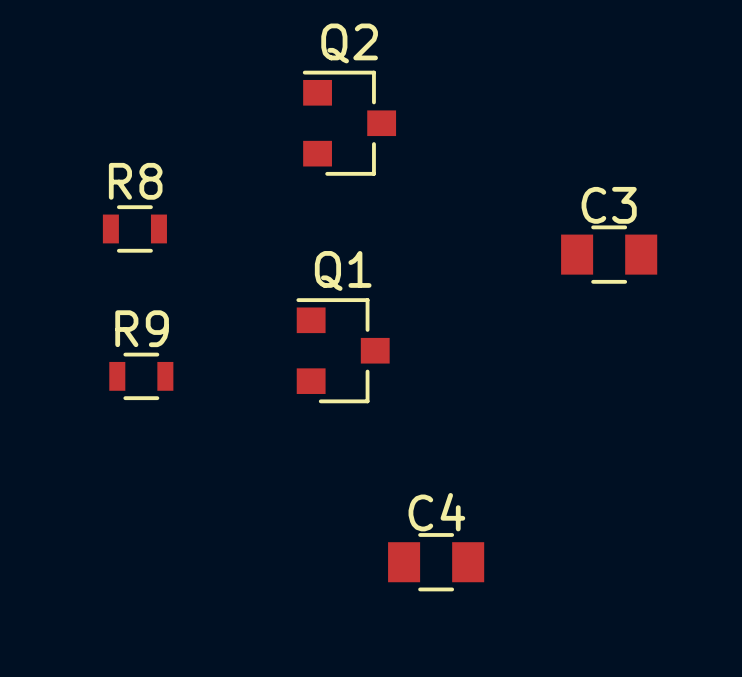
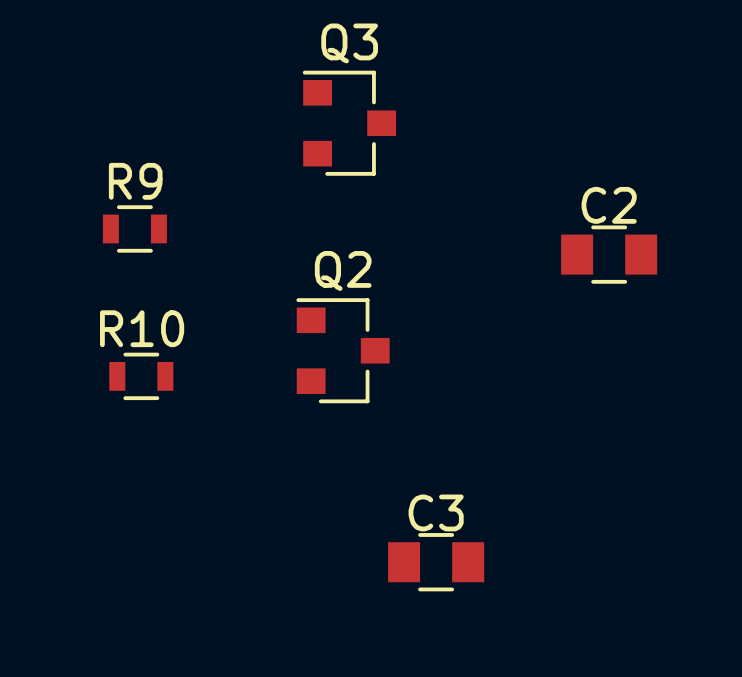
Q2 name: Q2 (349, 43) -> Q3 (349, 43)
R8 name: R8 (135, 181) -> R9 (135, 181)
C3 name: C3 (609, 205) -> C2 (609, 205)
Q1 name: Q1 (343, 270) -> Q2 (343, 270)
R9 name: R9 (142, 328) -> R10 (142, 328)
C4 name: C4 (436, 512) -> C3 (436, 512)

